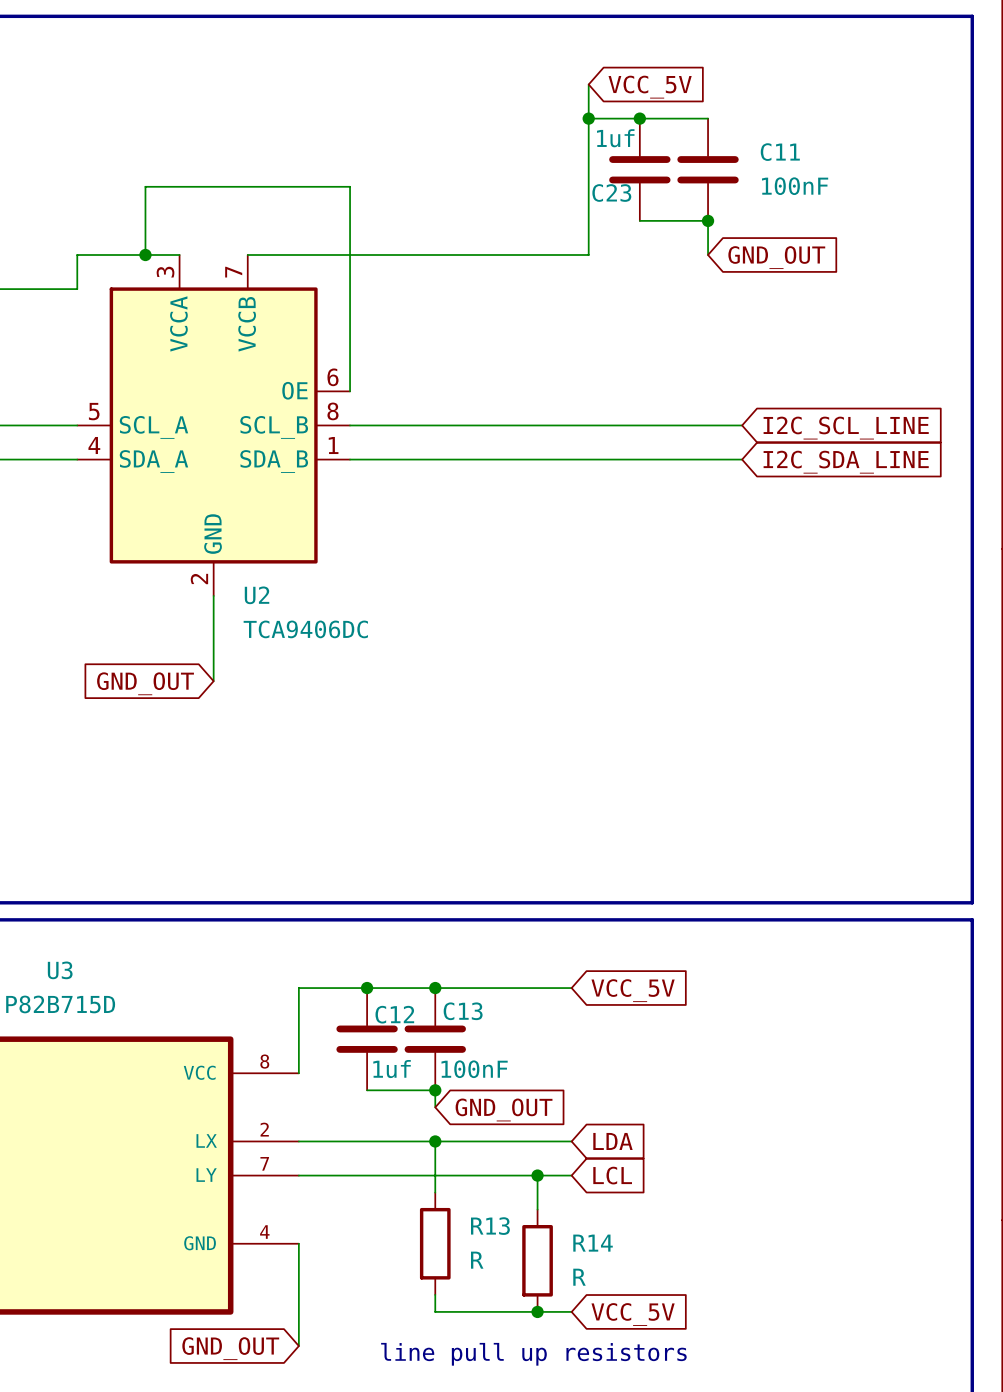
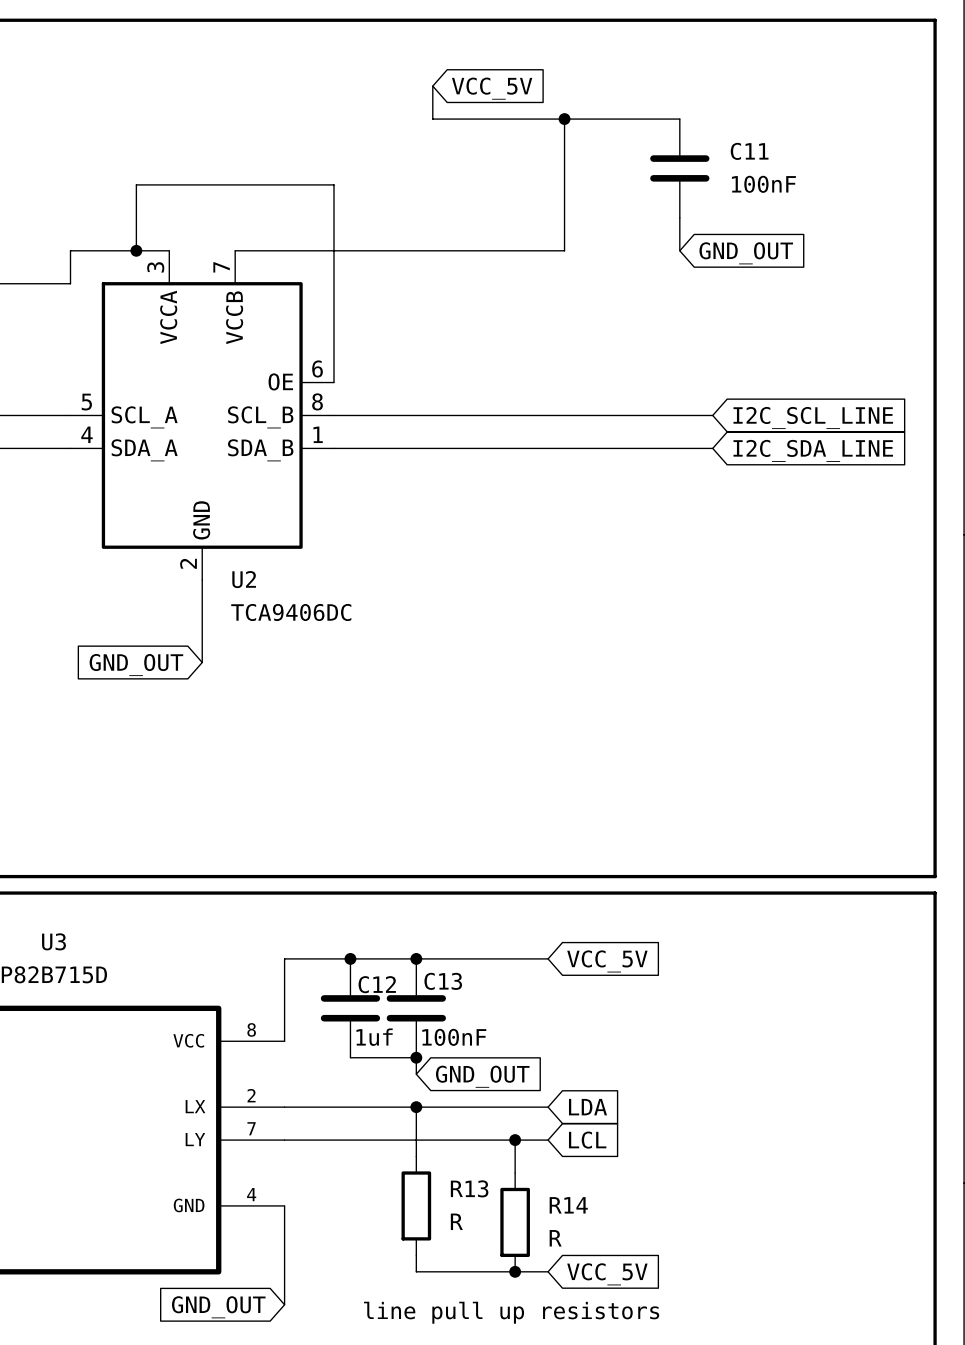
wire: (588, 84) (588, 118) -> (432, 86) (432, 119) (564, 119)
global label position: VCC_5V (650, 87) -> VCC_5V (492, 88)
junction: (639, 118) -> none
C23: 1uf (639, 169) -> none
wire: (639, 220) (708, 220) -> none
junction: (708, 220) -> none

